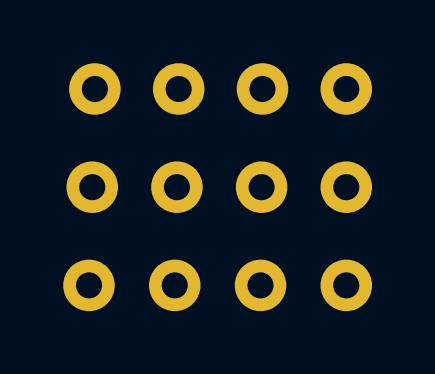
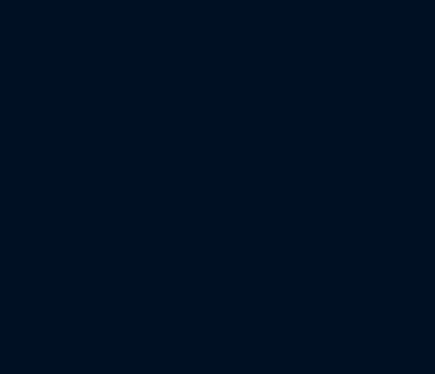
part: (217, 187) -> none

